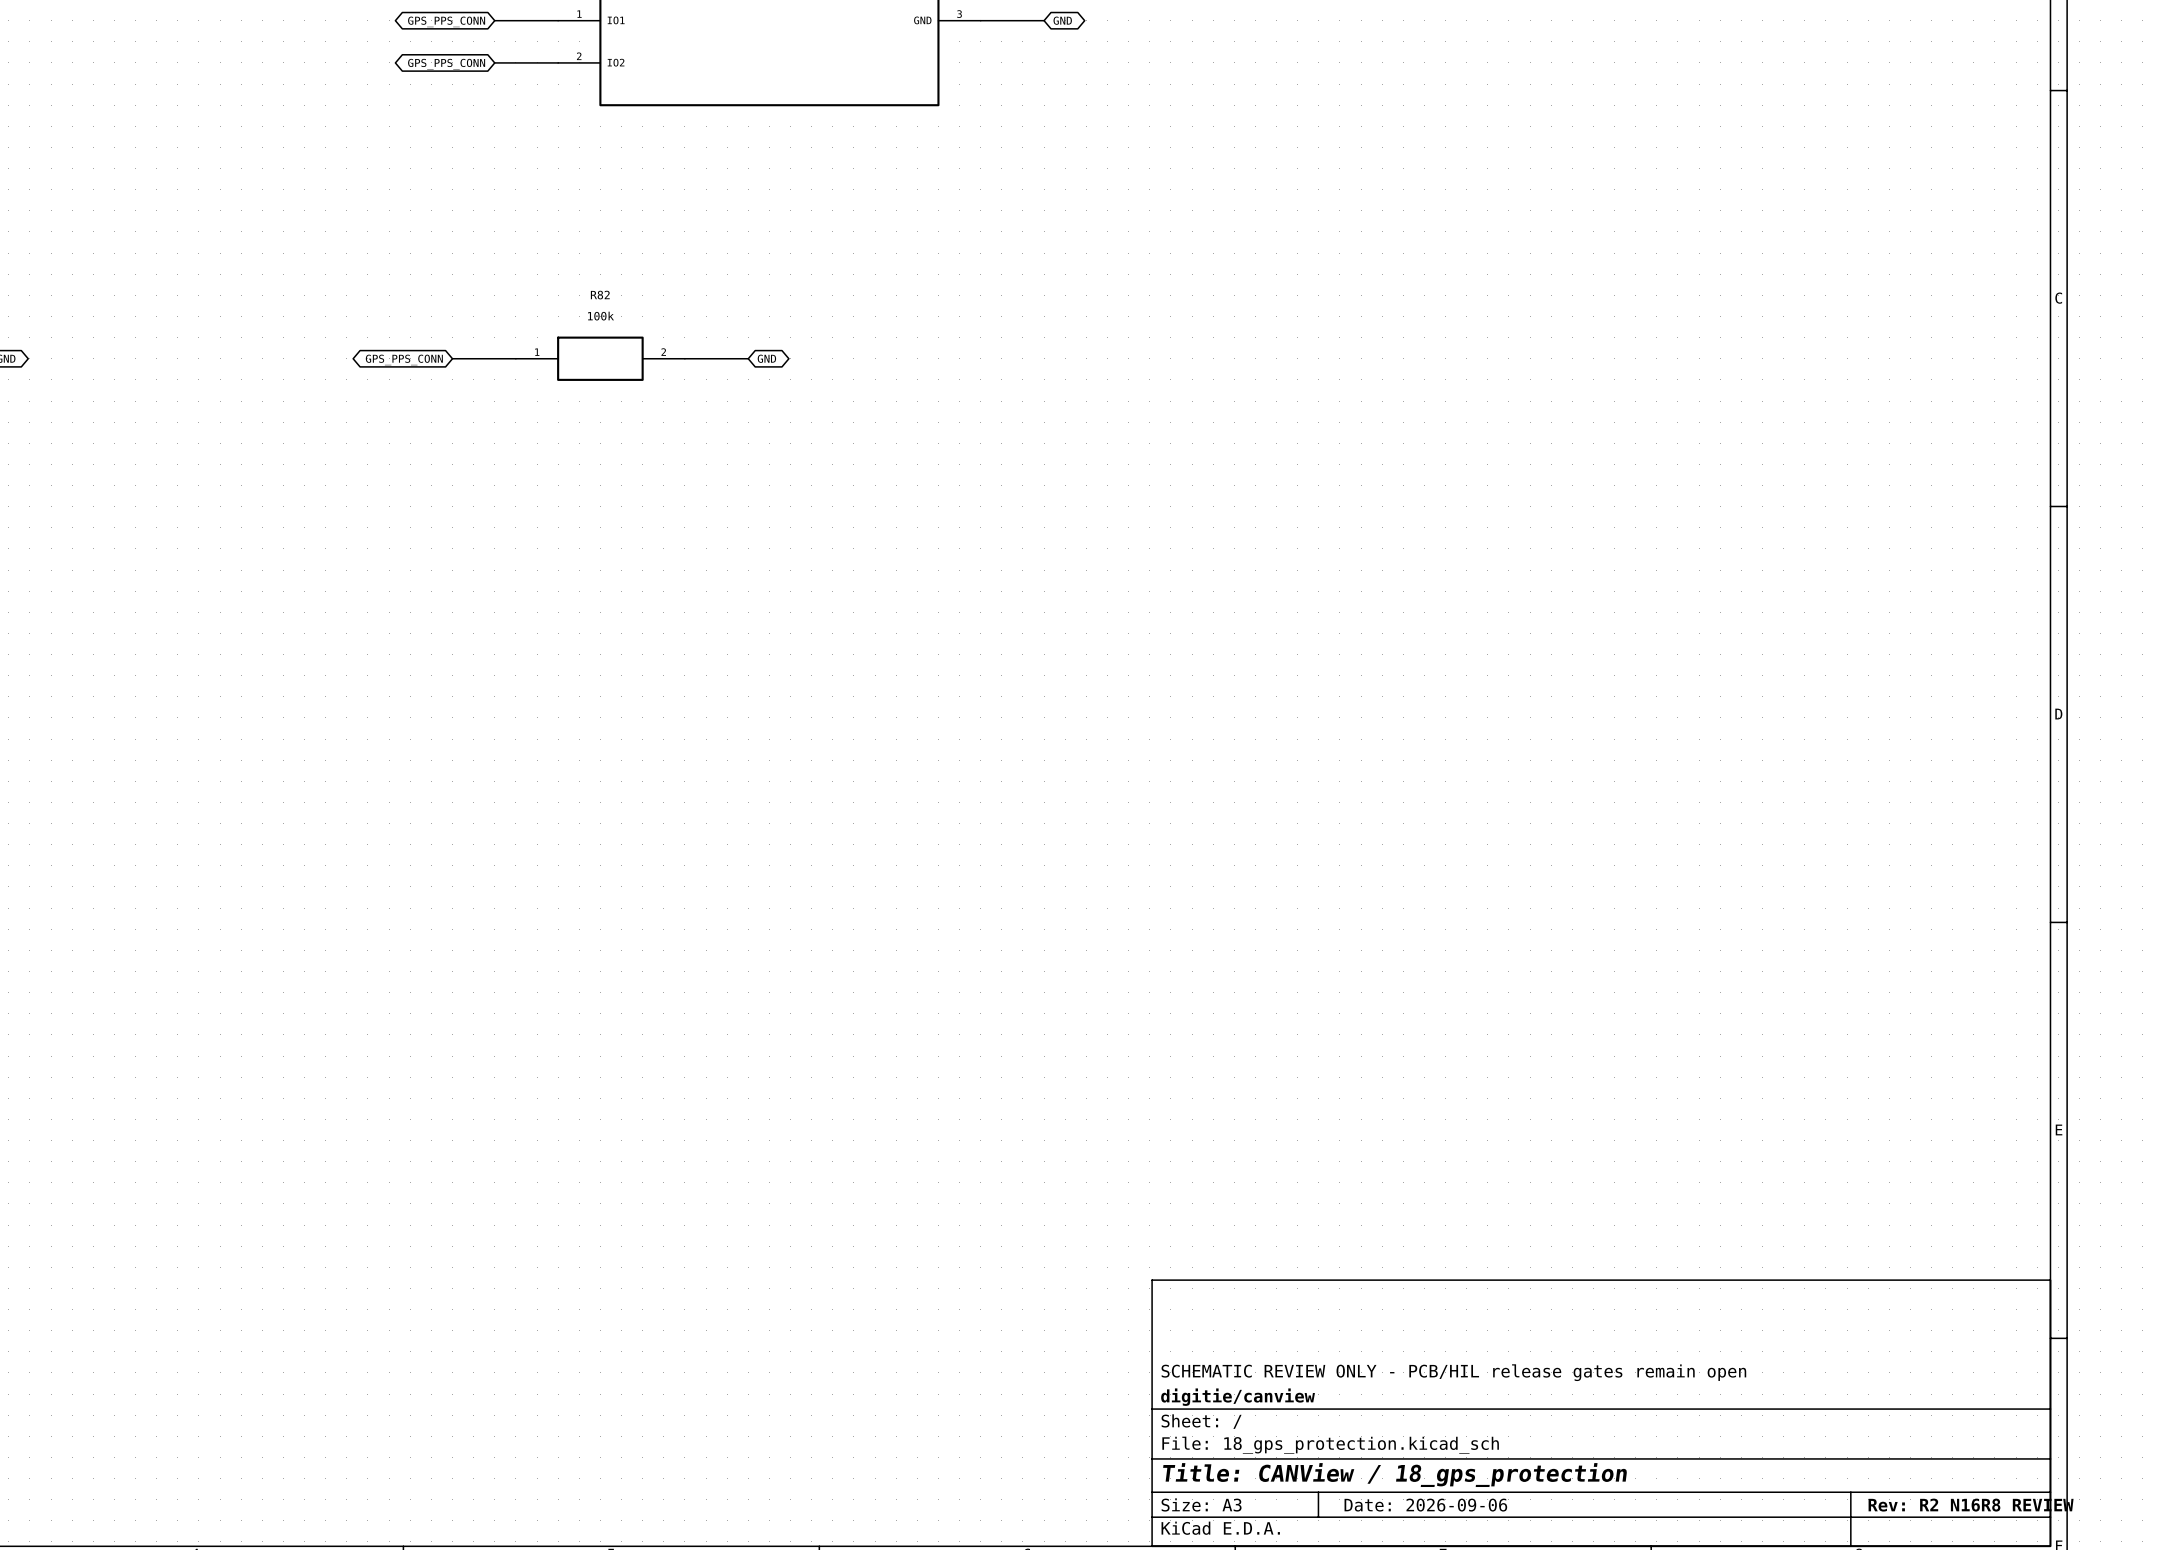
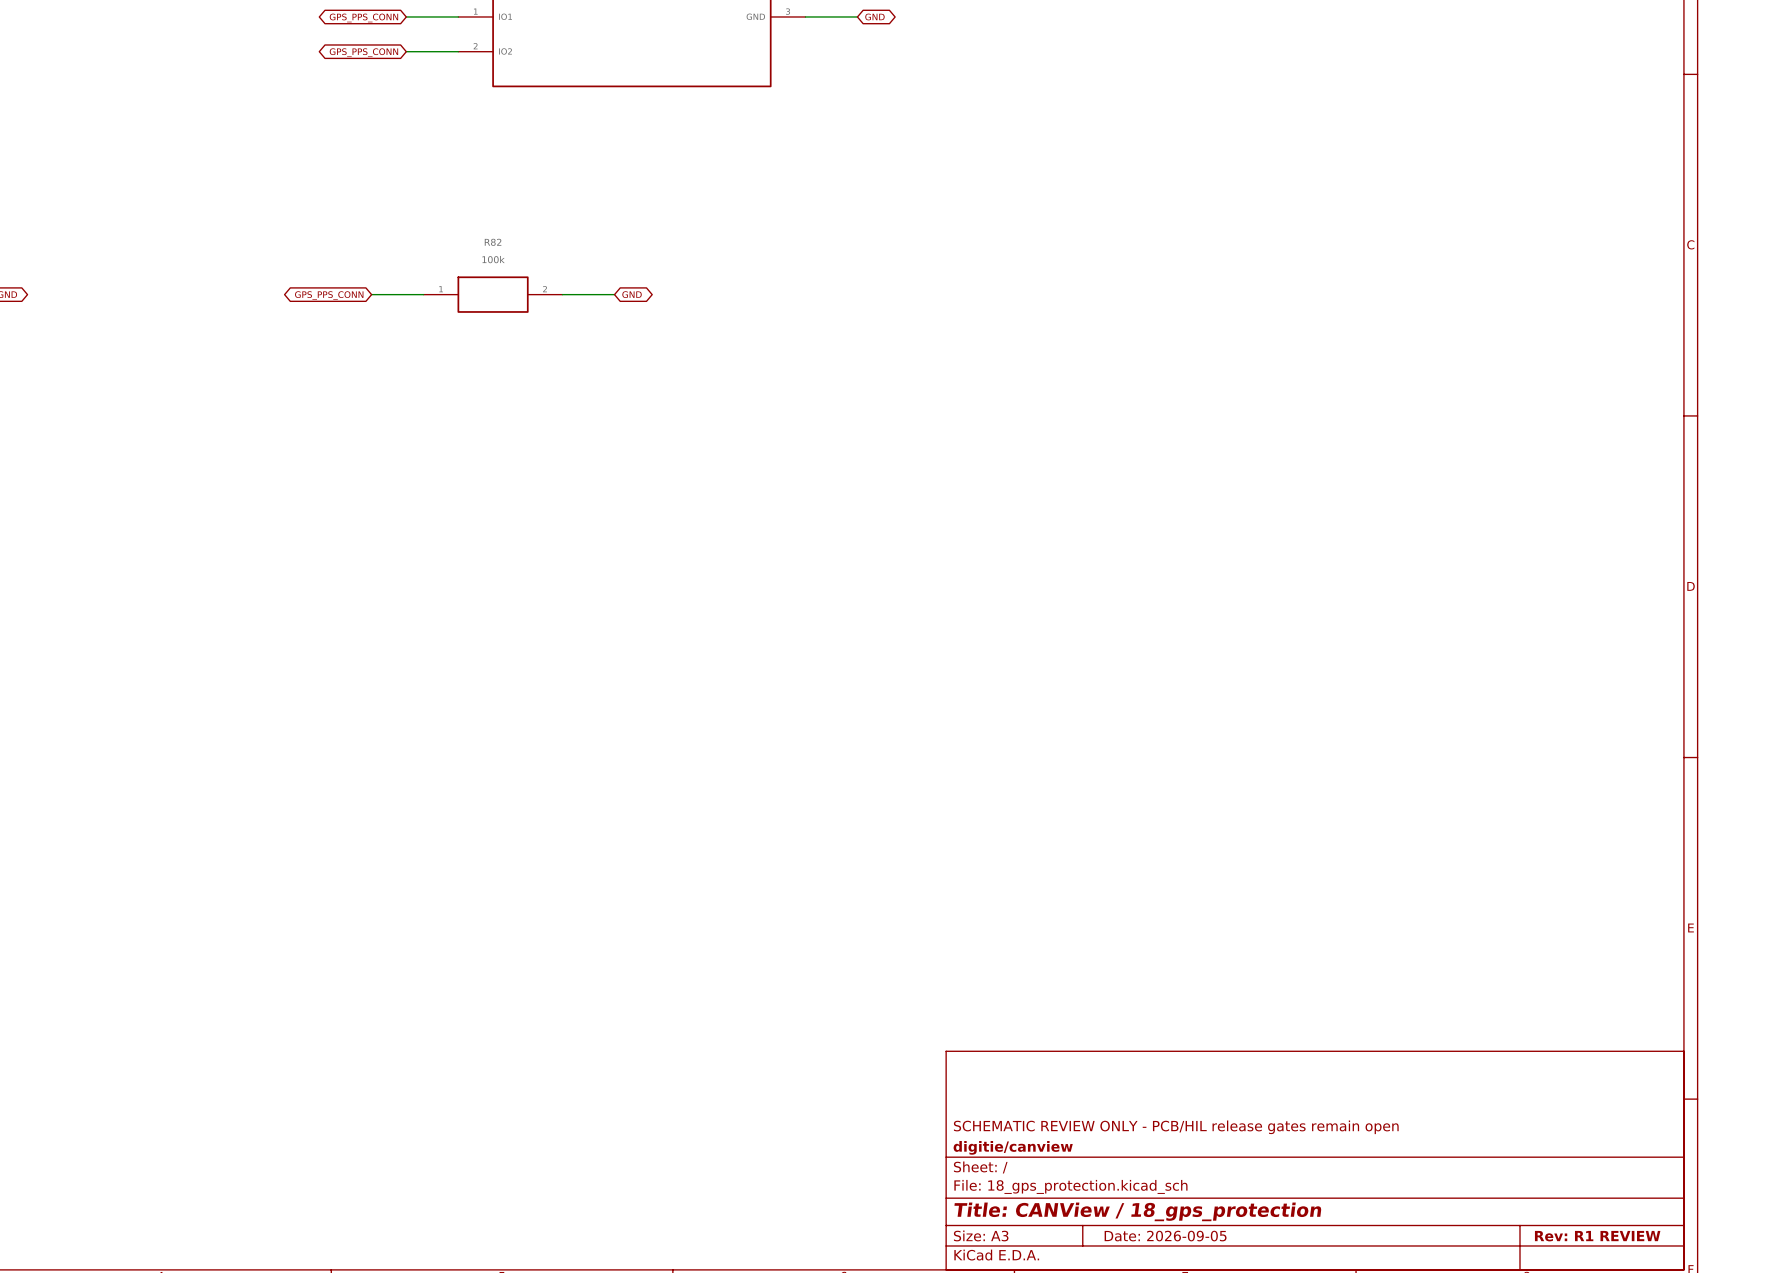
title block: Date: 2026-09-06 (1425, 1505) -> Date: 2026-09-05 (1165, 1236)
title block: Rev: R2 N16R8 REVIEW (1971, 1505) -> Rev: R1 REVIEW (1597, 1236)

